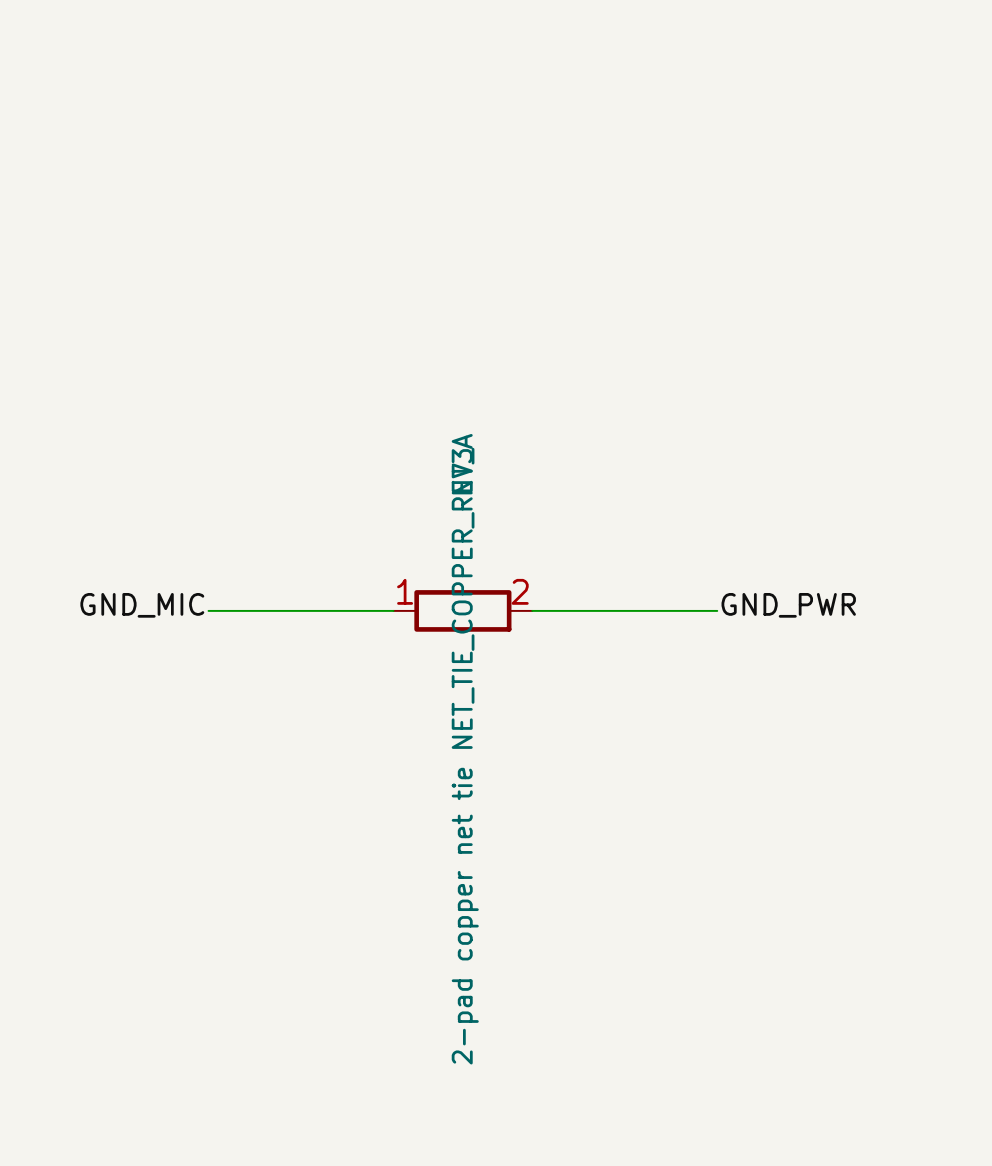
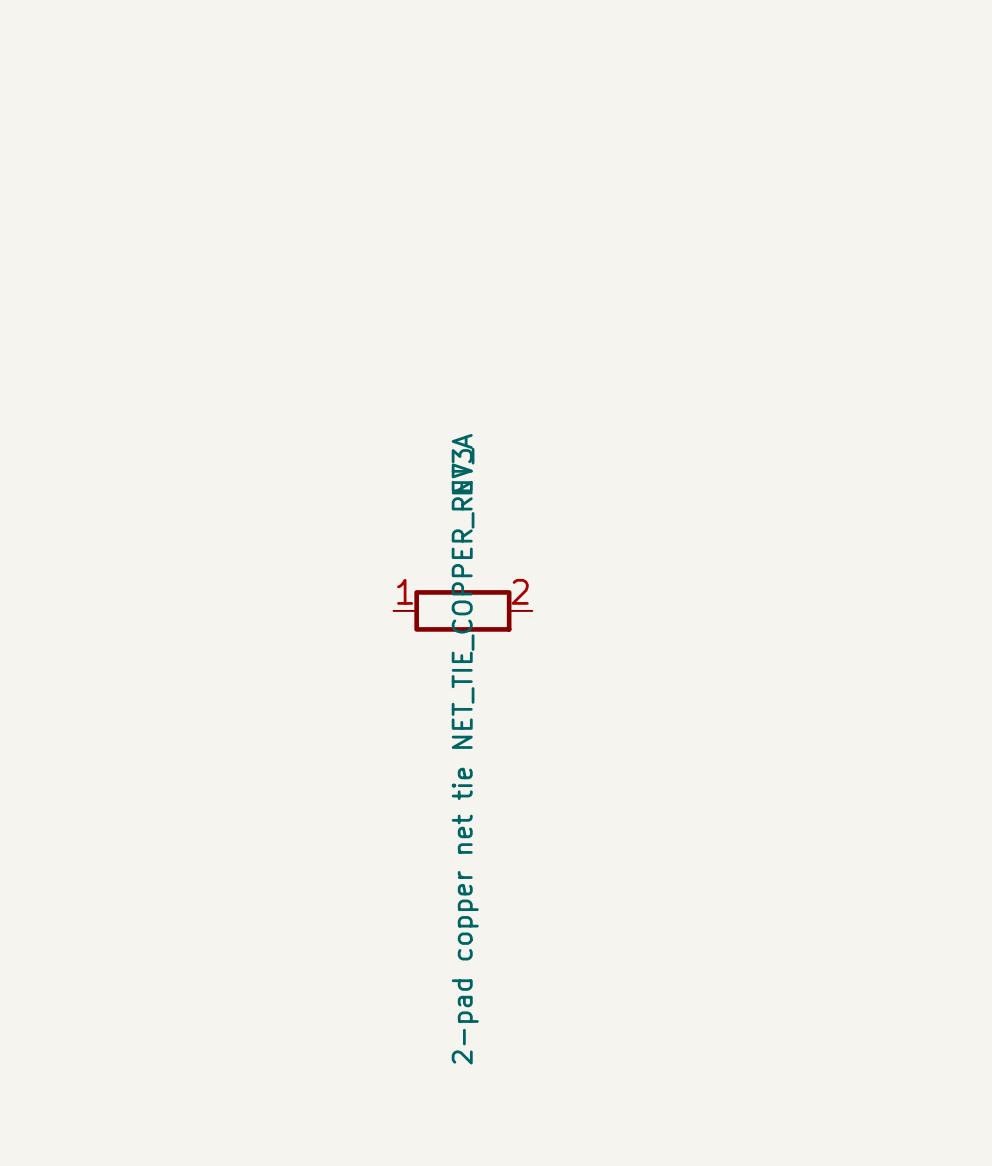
label: GND_MIC (142, 605) -> none
label: GND_PWR (788, 605) -> none
wire: (208, 610) (393, 610) -> none
wire: (532, 610) (717, 610) -> none

